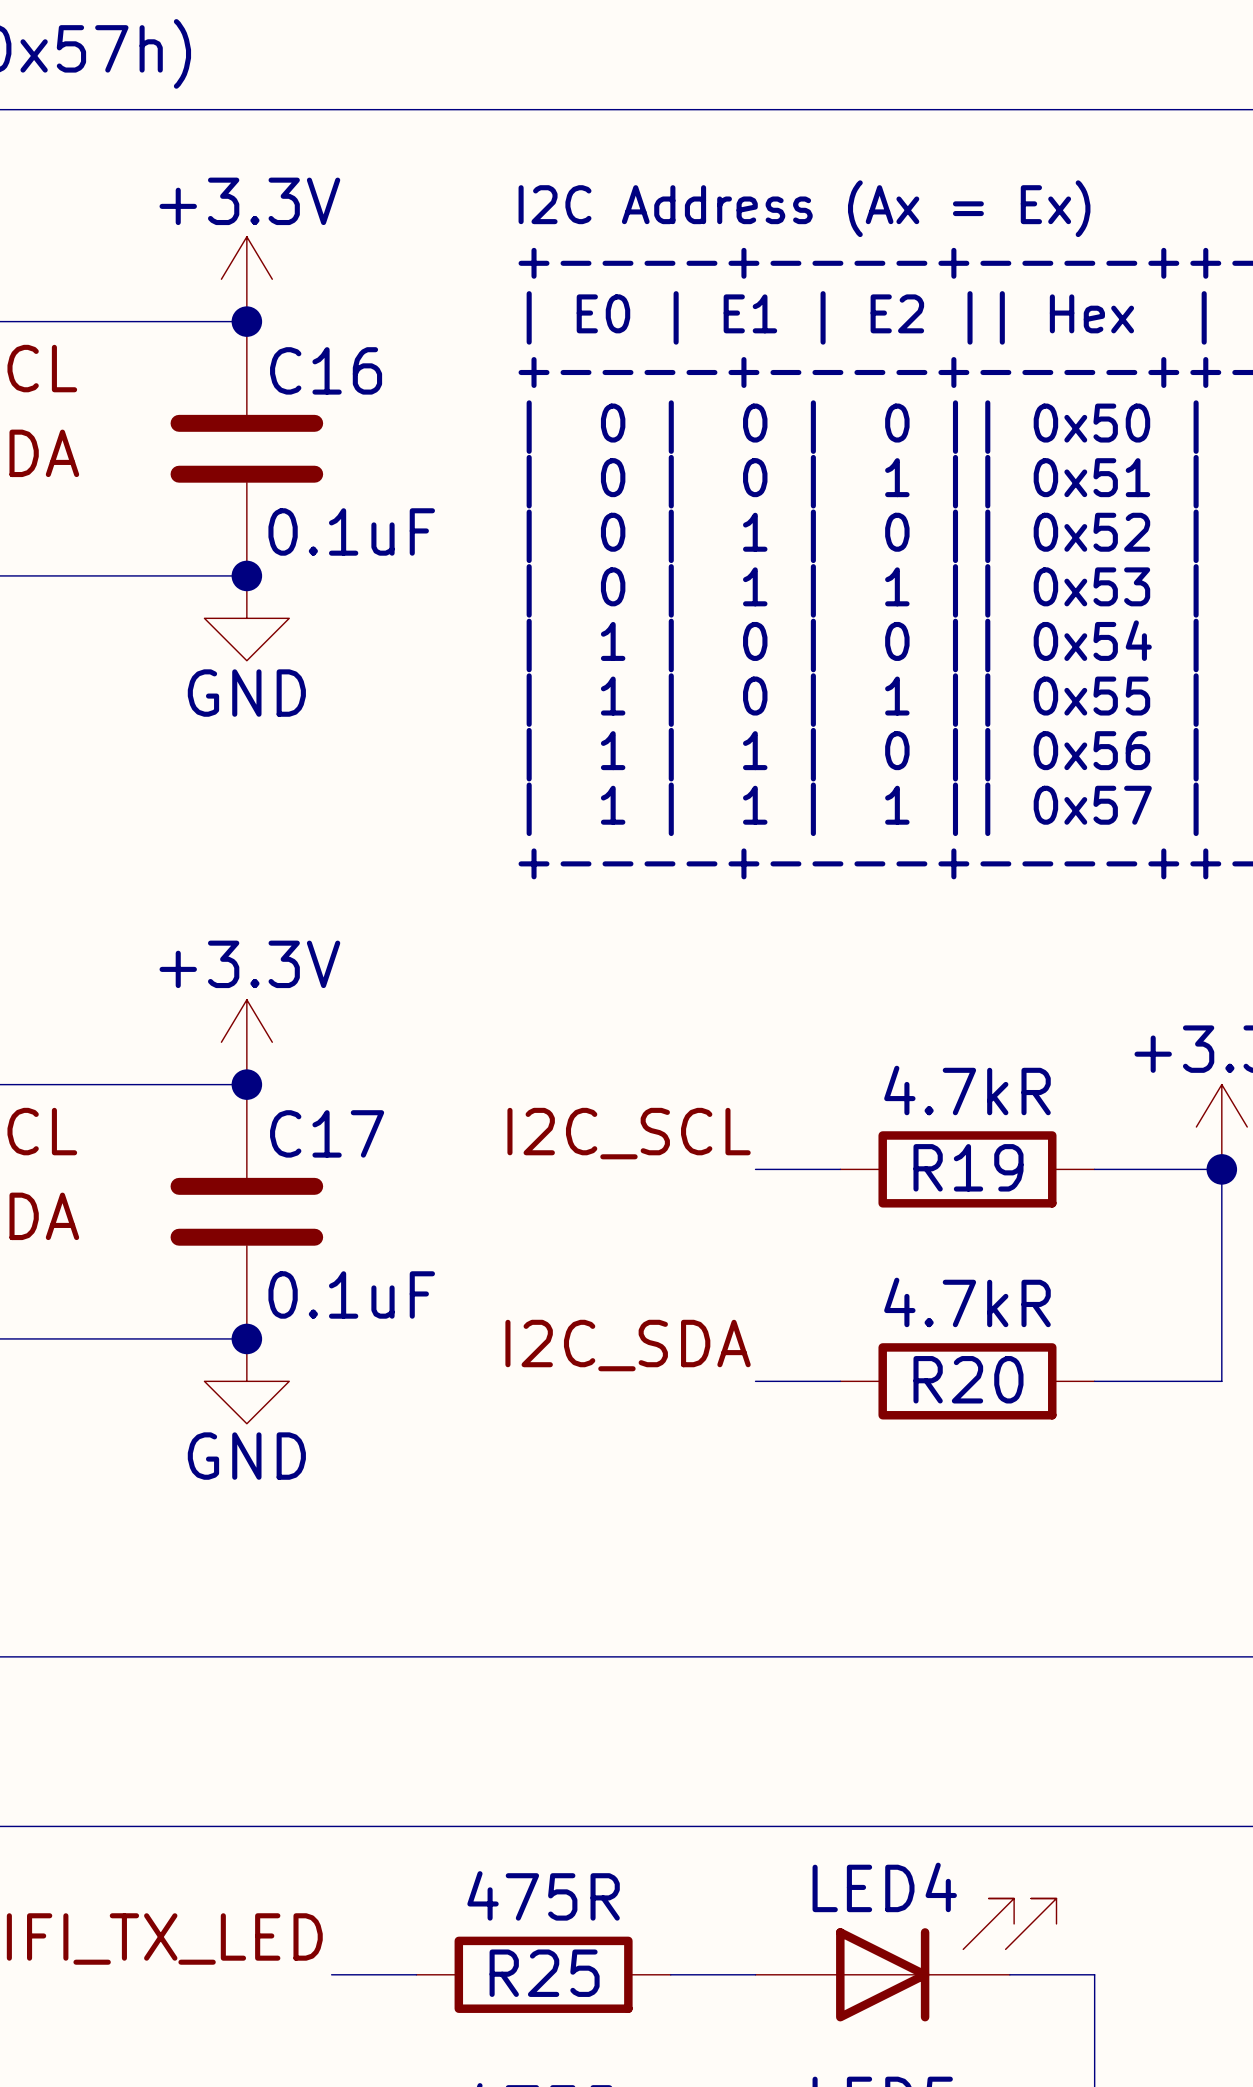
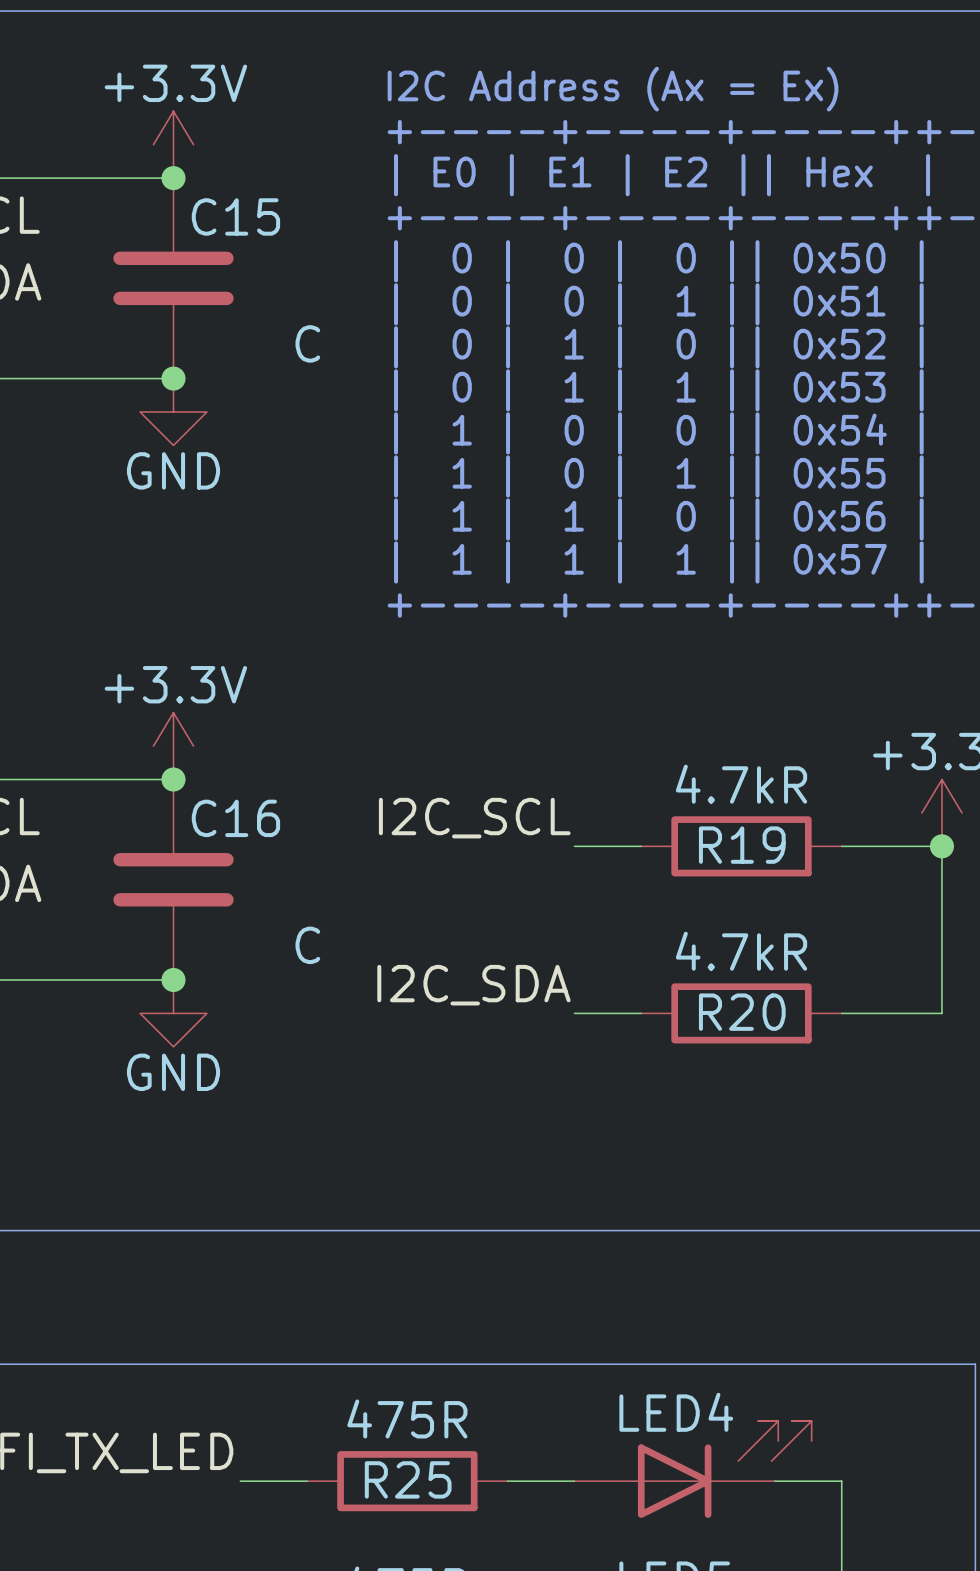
C16 name: C16 (326, 370) -> C15 (235, 216)
C16 value: 0.1uF (351, 531) -> C (307, 343)
C17 name: C17 (327, 1133) -> C16 (235, 818)
C17 value: 0.1uF (351, 1294) -> C (307, 945)

